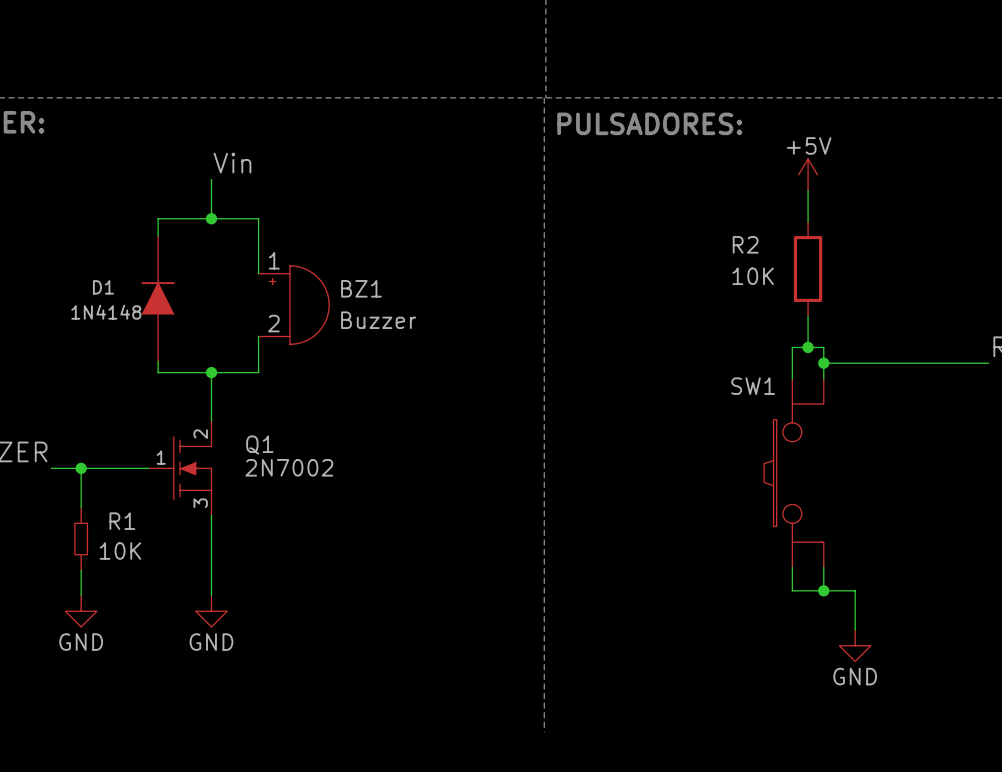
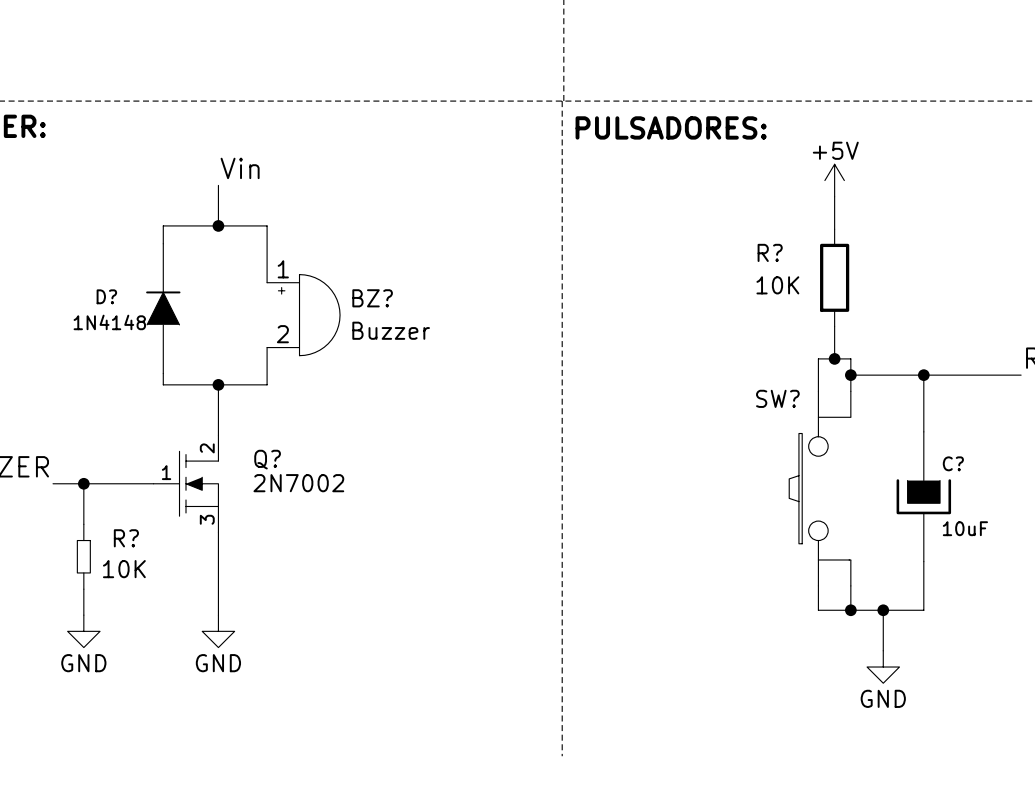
R2 name: R2 (745, 244) -> R? (770, 252)
D1 name: D1 (103, 287) -> D? (106, 296)
BZ1 name: BZ1 (361, 288) -> BZ? (372, 298)
wire: none -> (923, 375) (923, 431)
junction: none -> (923, 375)
SW1 name: SW1 (753, 386) -> SW? (777, 398)
Q1 name: Q1 (259, 444) -> Q? (267, 459)
C?: none -> 10uF (923, 496)
R1 name: R1 (122, 521) -> R? (126, 538)
wire: none -> (923, 561) (923, 610) (883, 610)
junction: none -> (883, 610)

